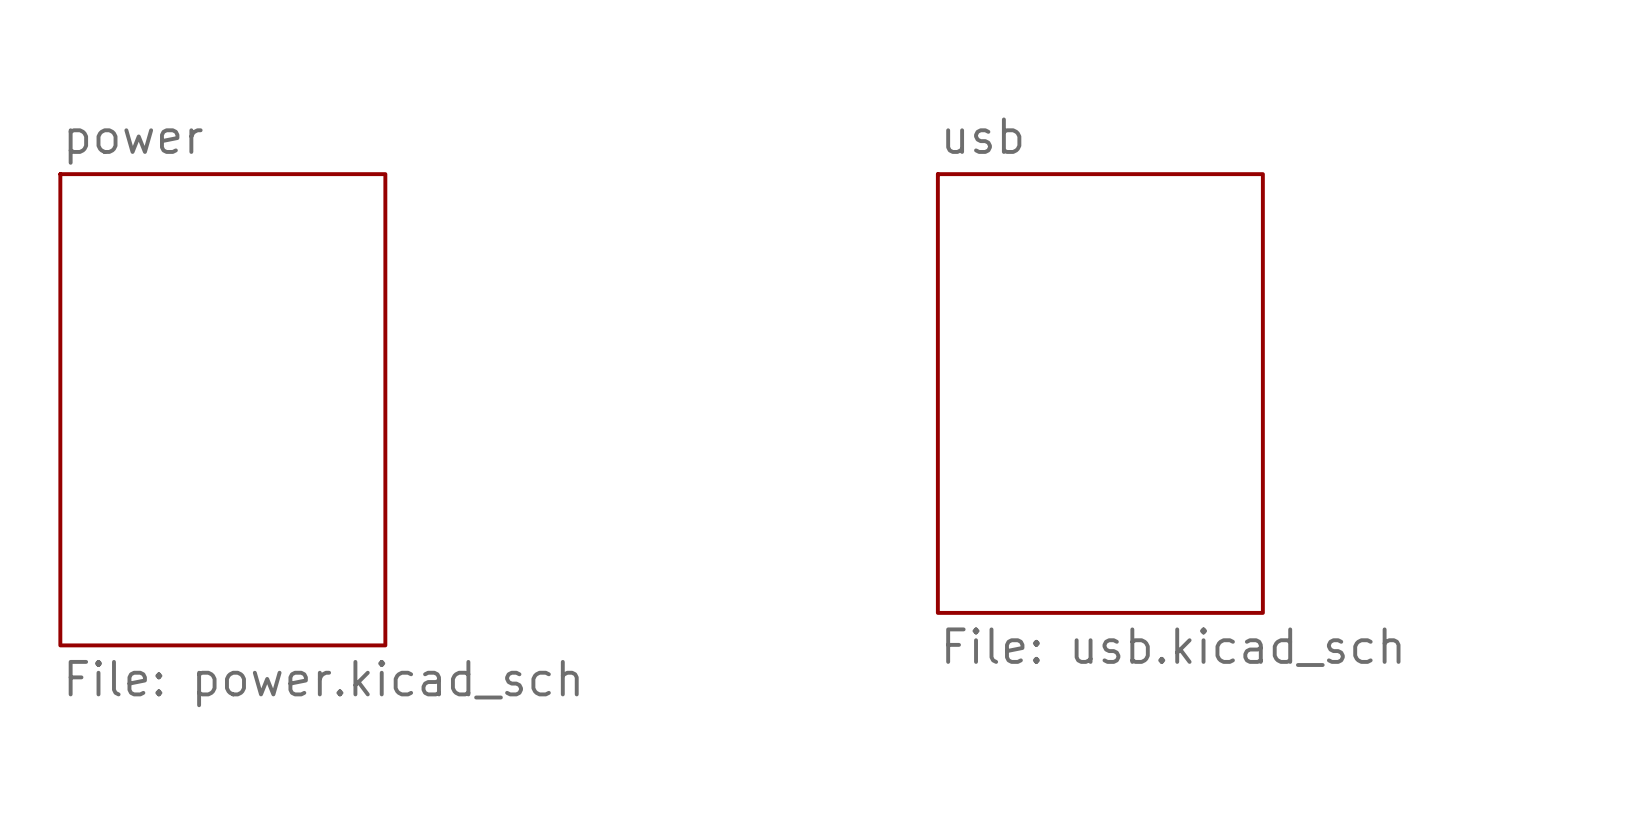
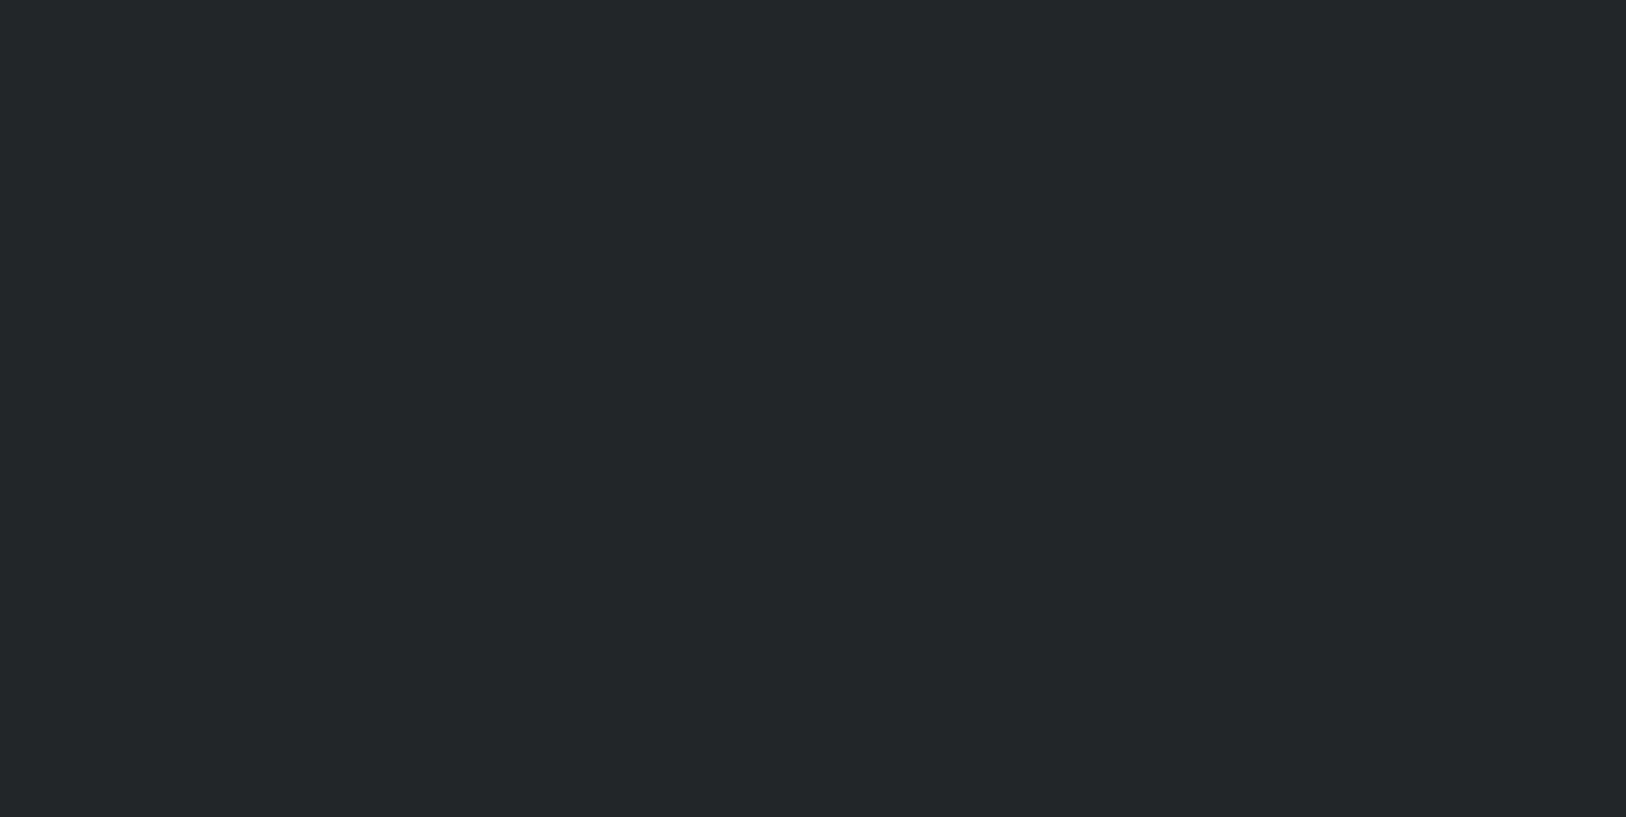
sheet usb: File: usb.kicad_sch (1100, 393) -> none
sheet power: File: power.kicad_sch (222, 409) -> none

